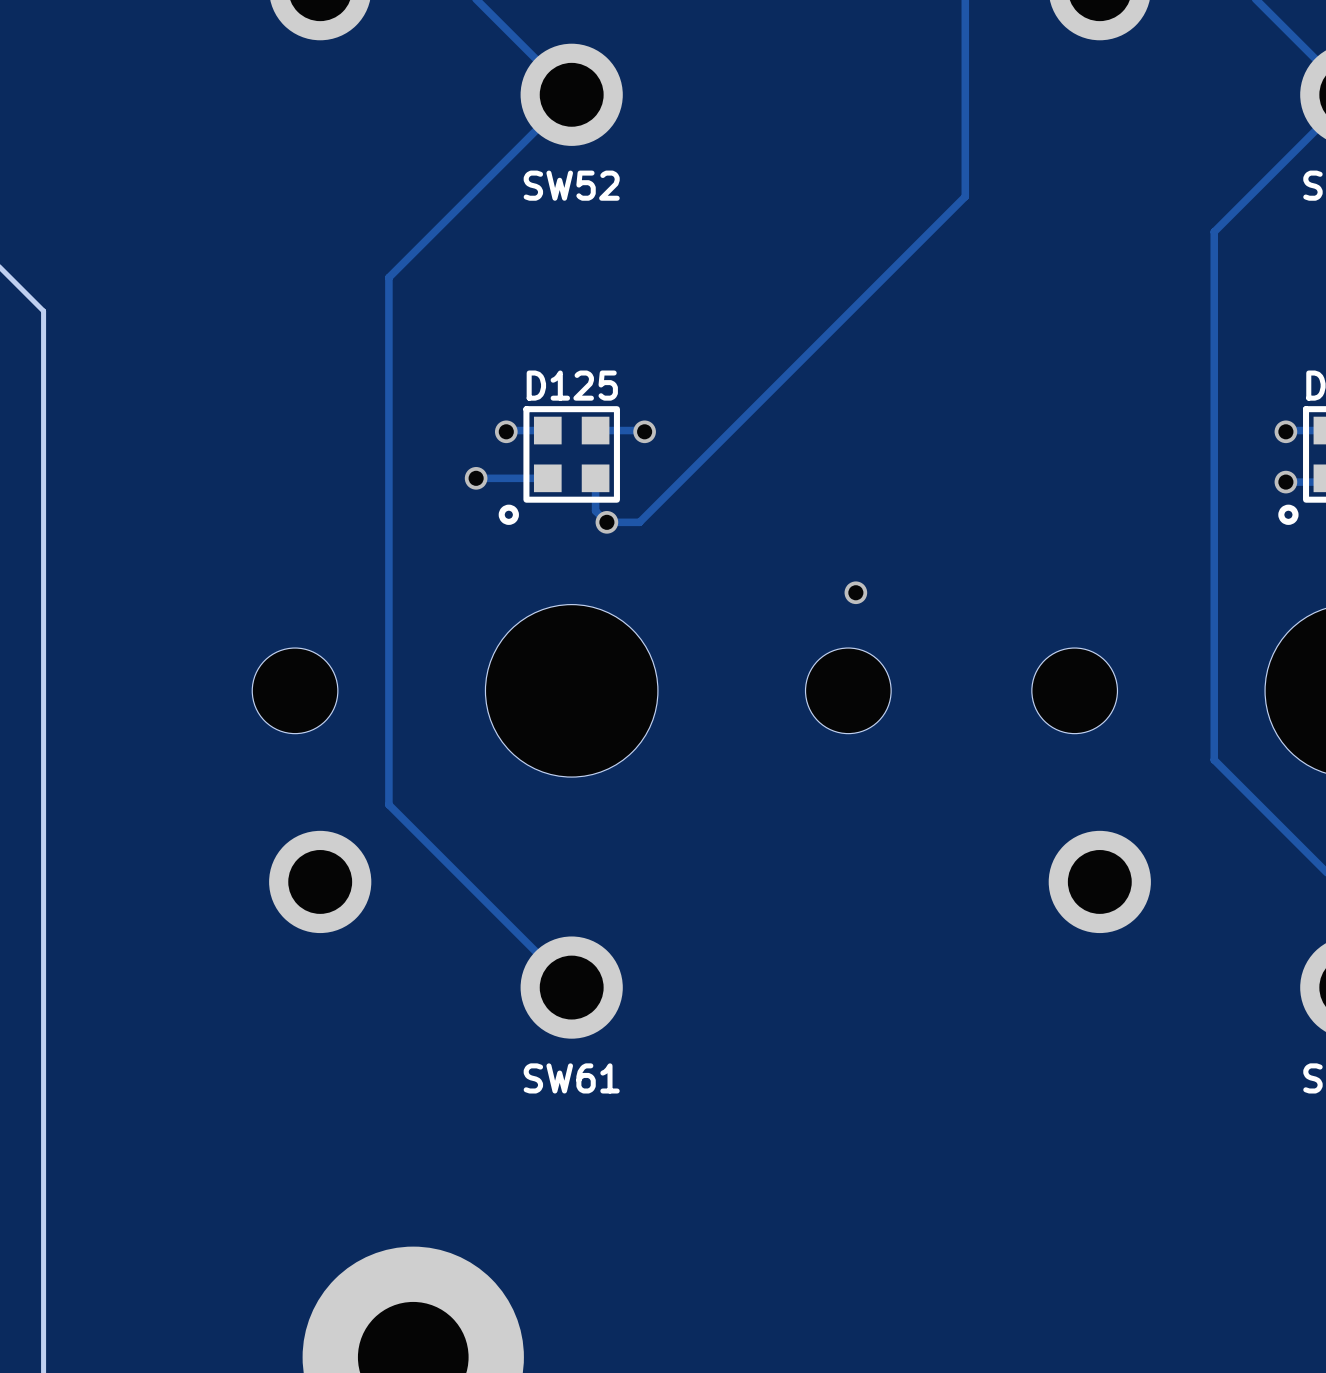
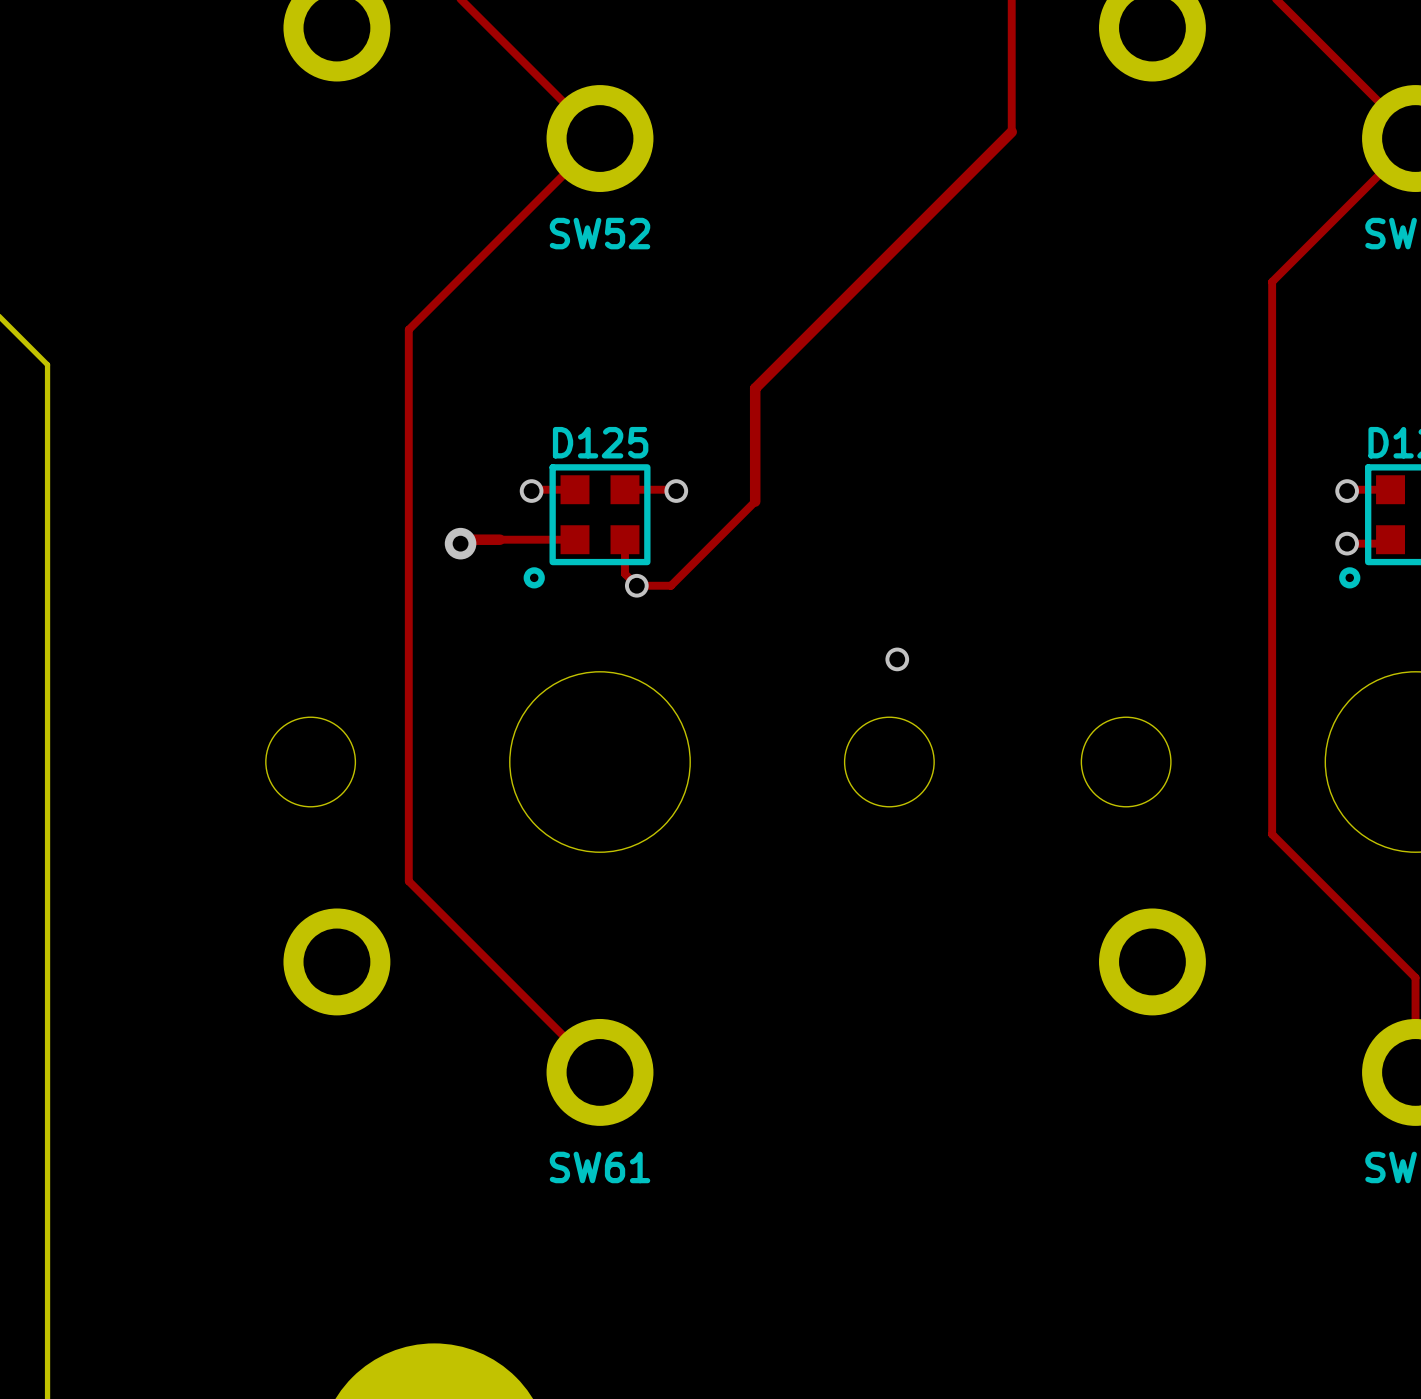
track: (965, 88) (965, 196) (720, 441) -> (1011, 131) (755, 388) (755, 501)
track: none -> (500, 539) (464, 539) (460, 543)
via: (476, 478) -> none
via: none -> (460, 543)

